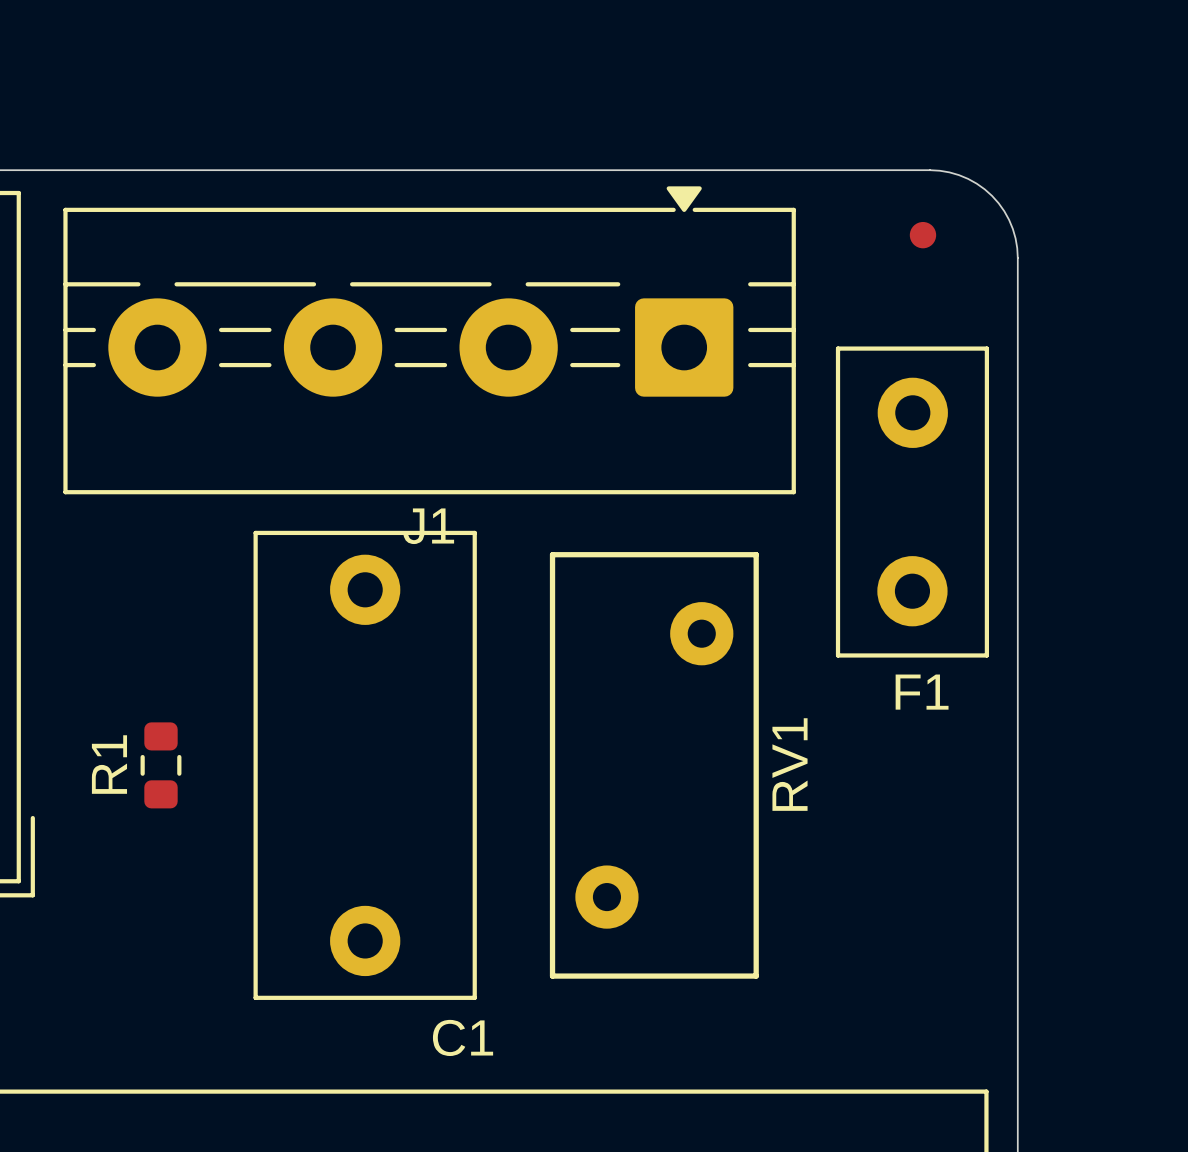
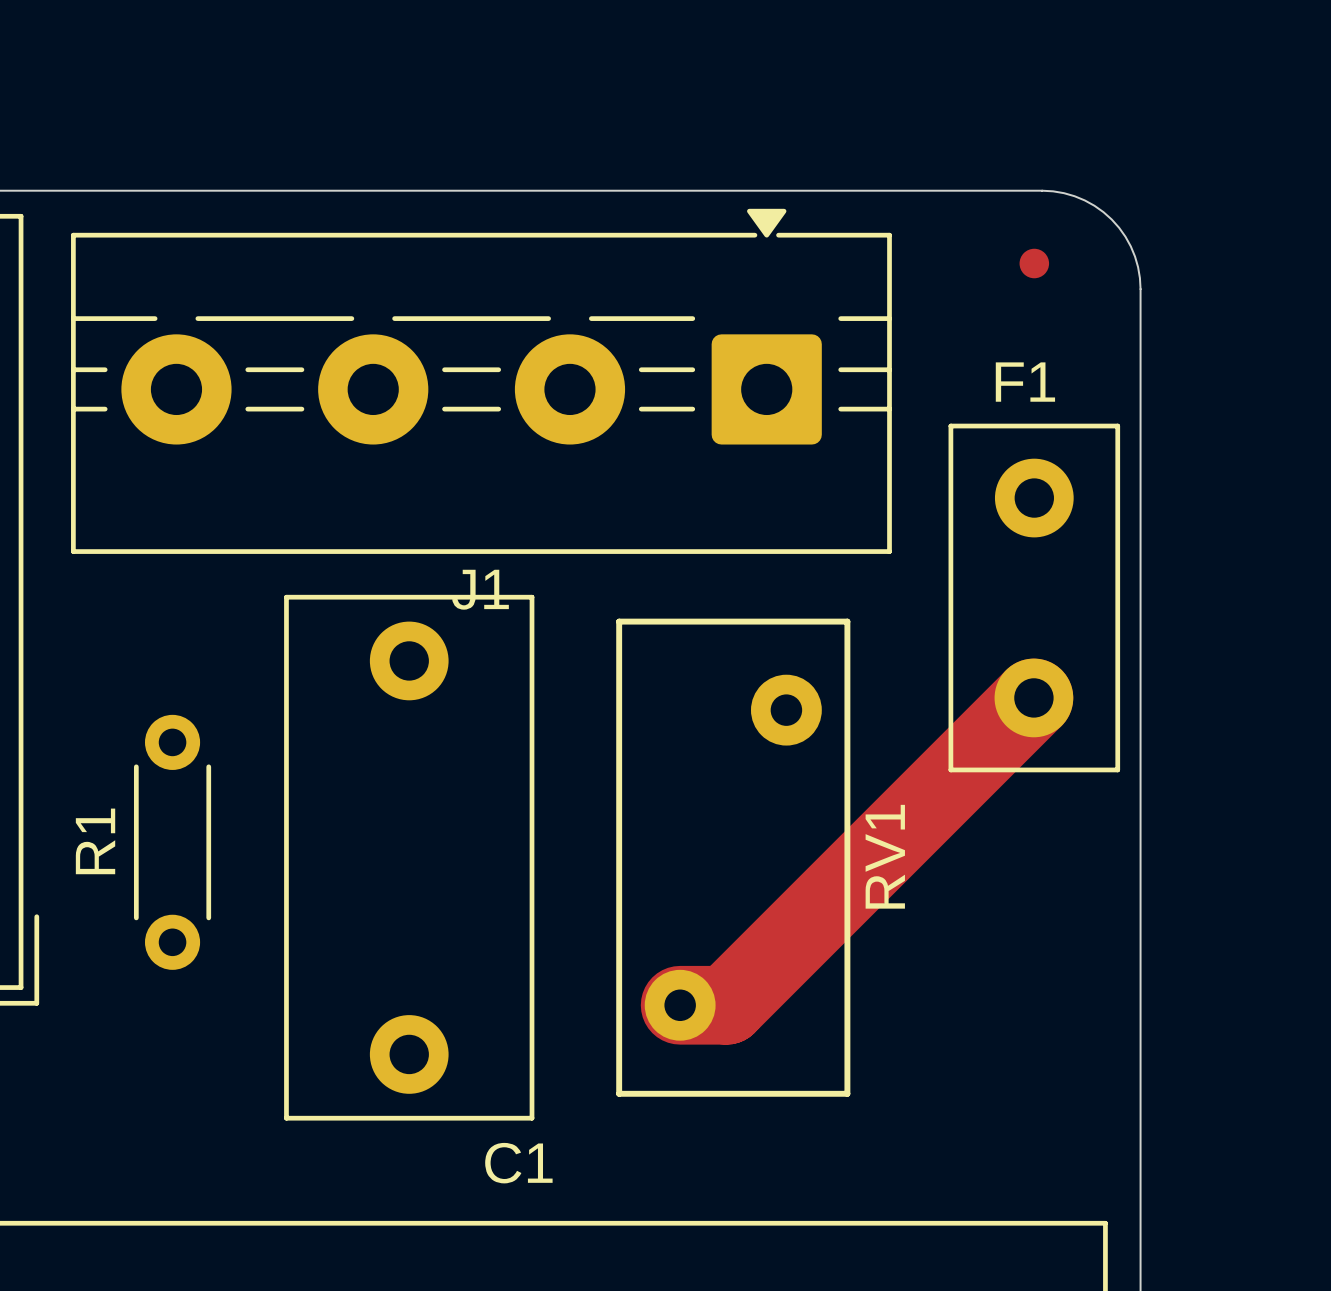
F1 position: (912, 502) -> (1034, 597)
track: none -> (1033, 697) (726, 1005) (680, 1005)
F1 name position: F1 (922, 692) -> F1 (1025, 382)
R1 footprint: [140, 722, 182, 809] -> [133, 714, 212, 970]

